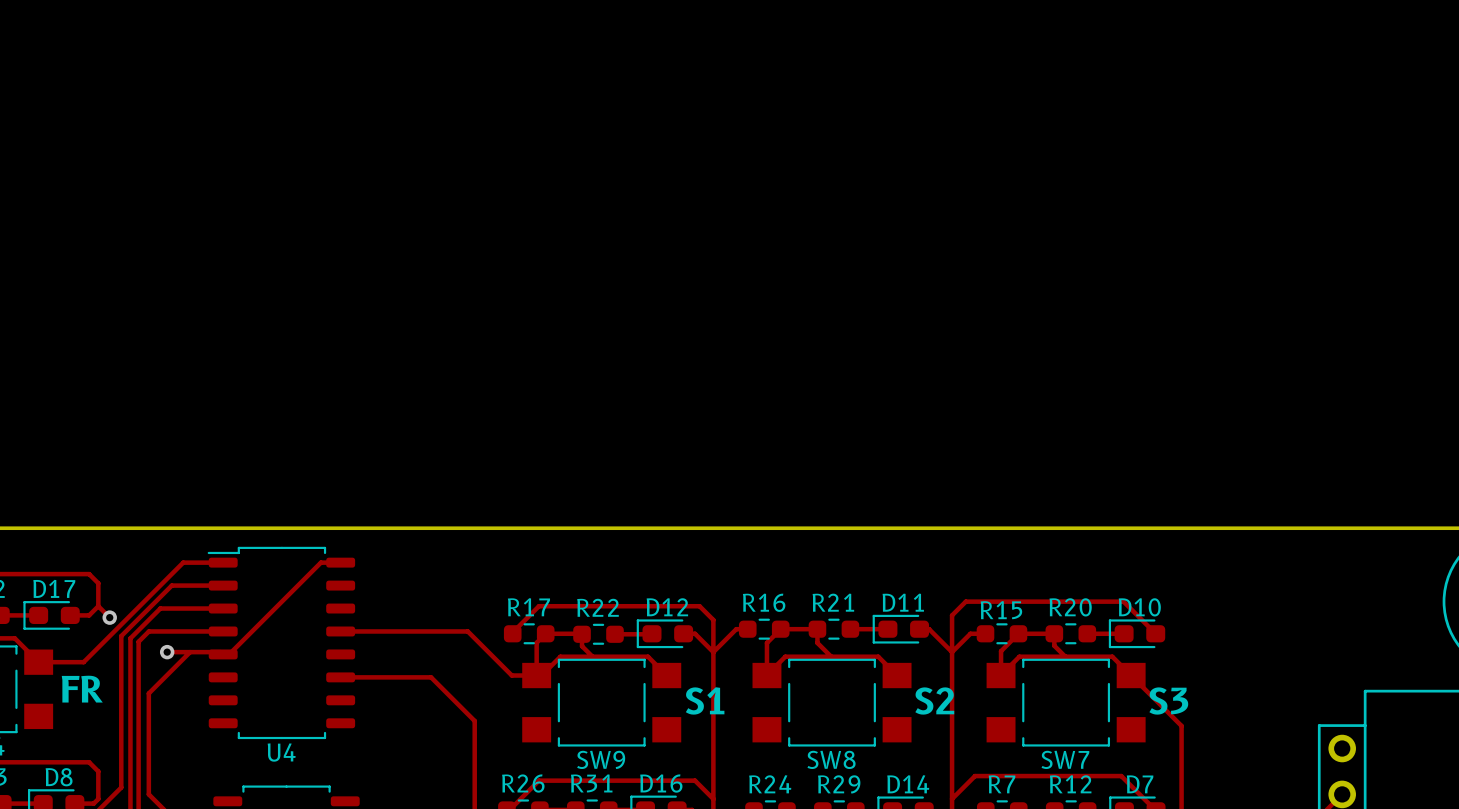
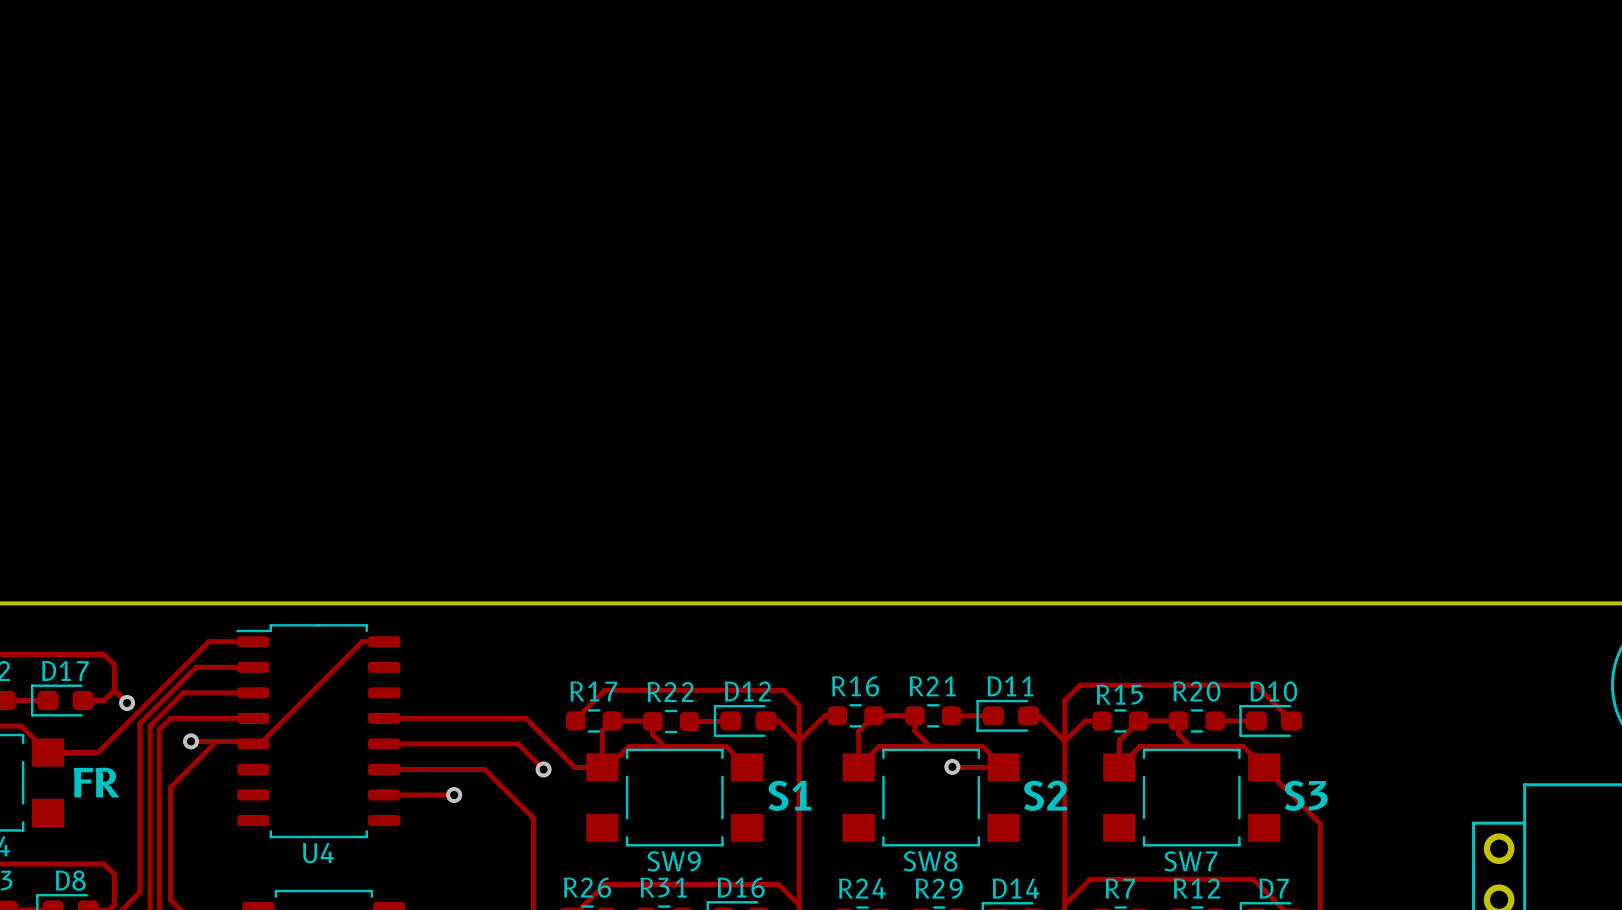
track: none -> (384, 743) (518, 743) (543, 769)
track: none -> (952, 766) (1003, 767)
via: none -> (952, 766)
via: none -> (543, 769)
track: none -> (384, 795) (454, 795)
via: none -> (454, 795)

